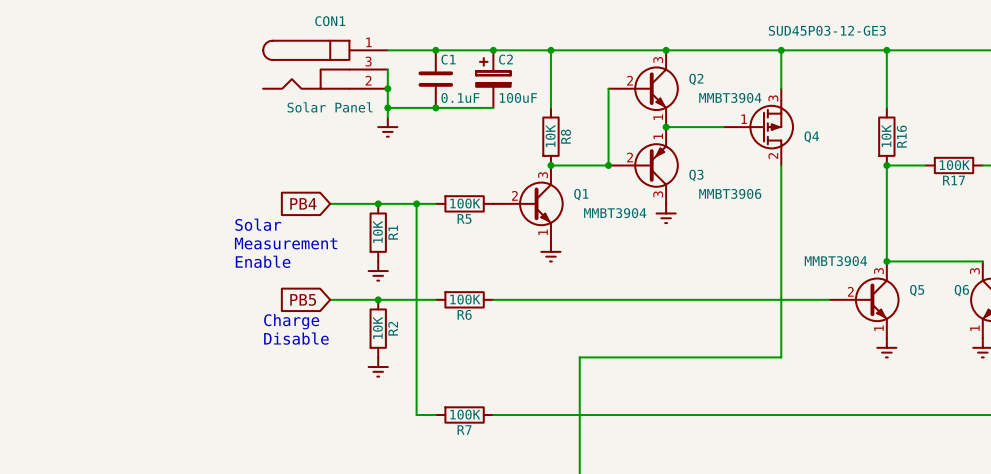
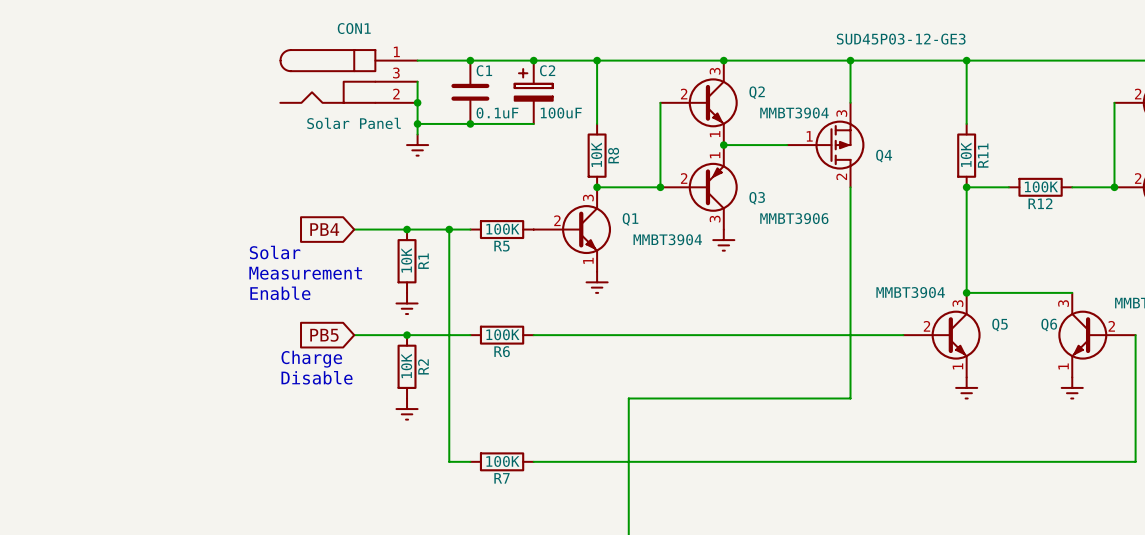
R16 name: R16 (901, 136) -> R11 (983, 155)
R17 name: R17 (953, 180) -> R12 (1040, 203)

